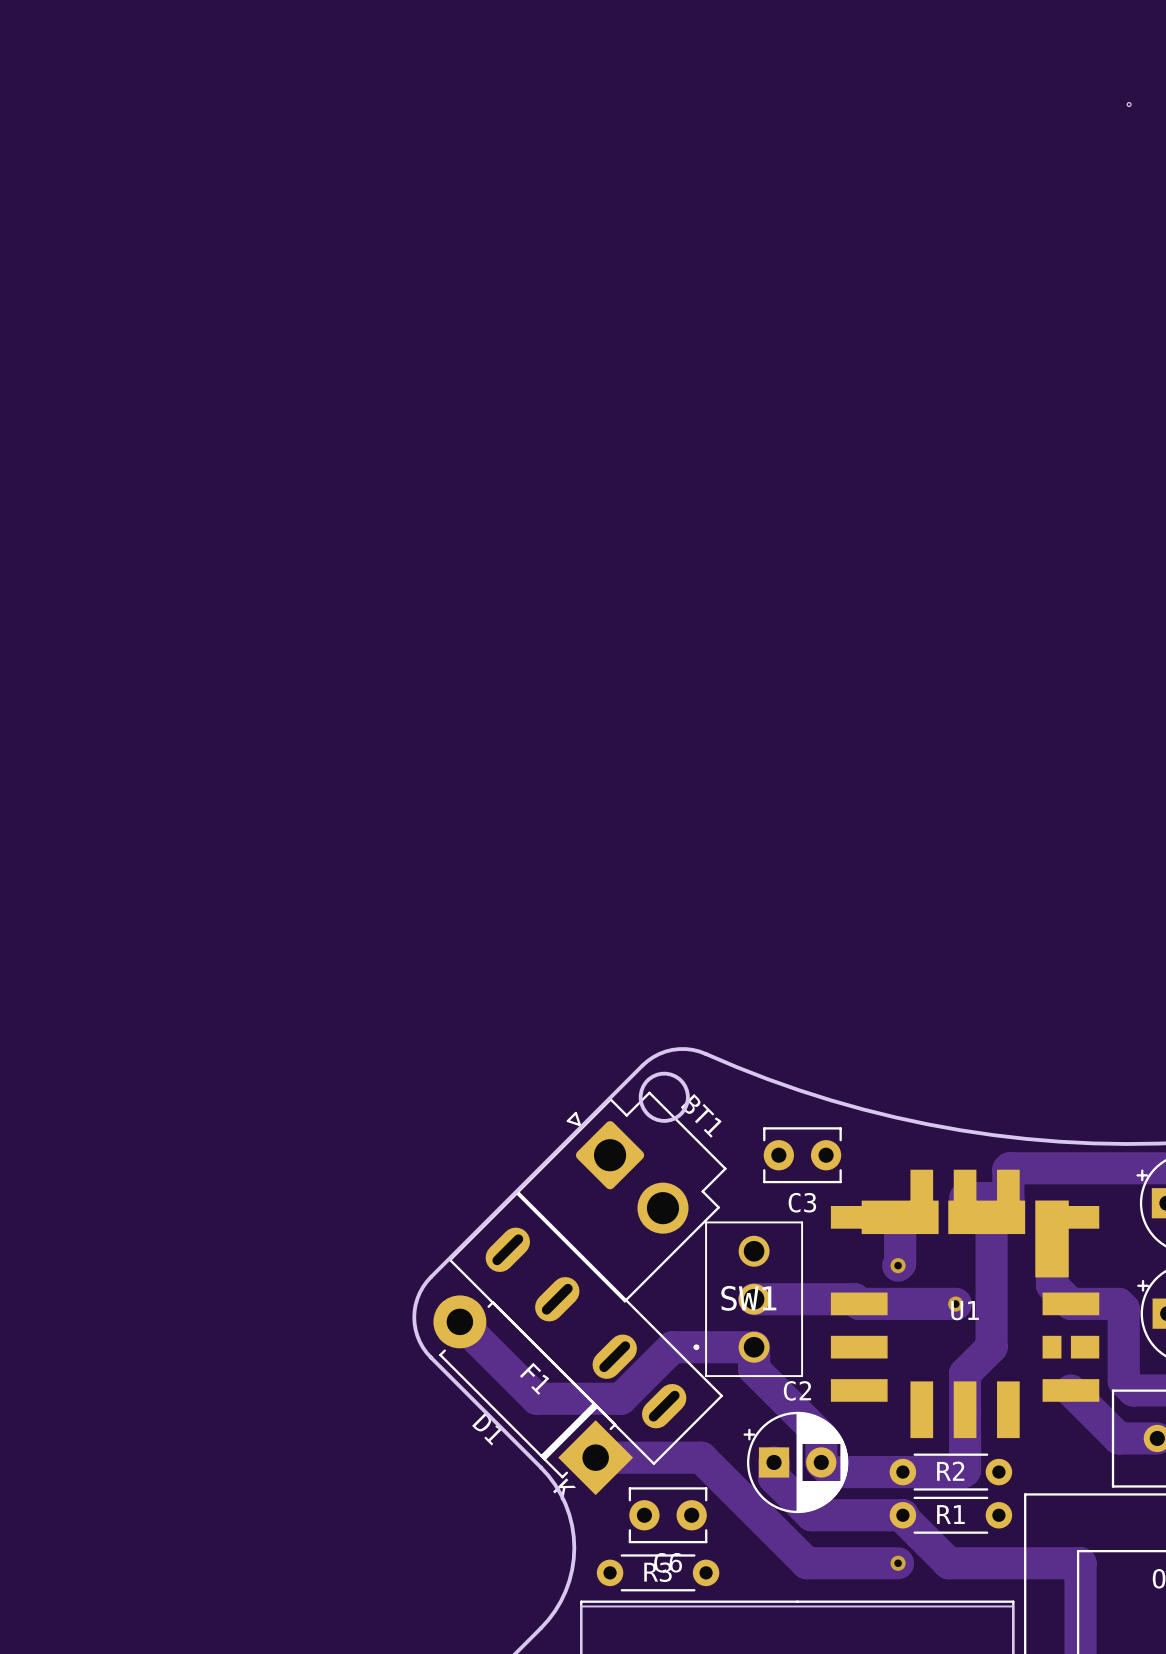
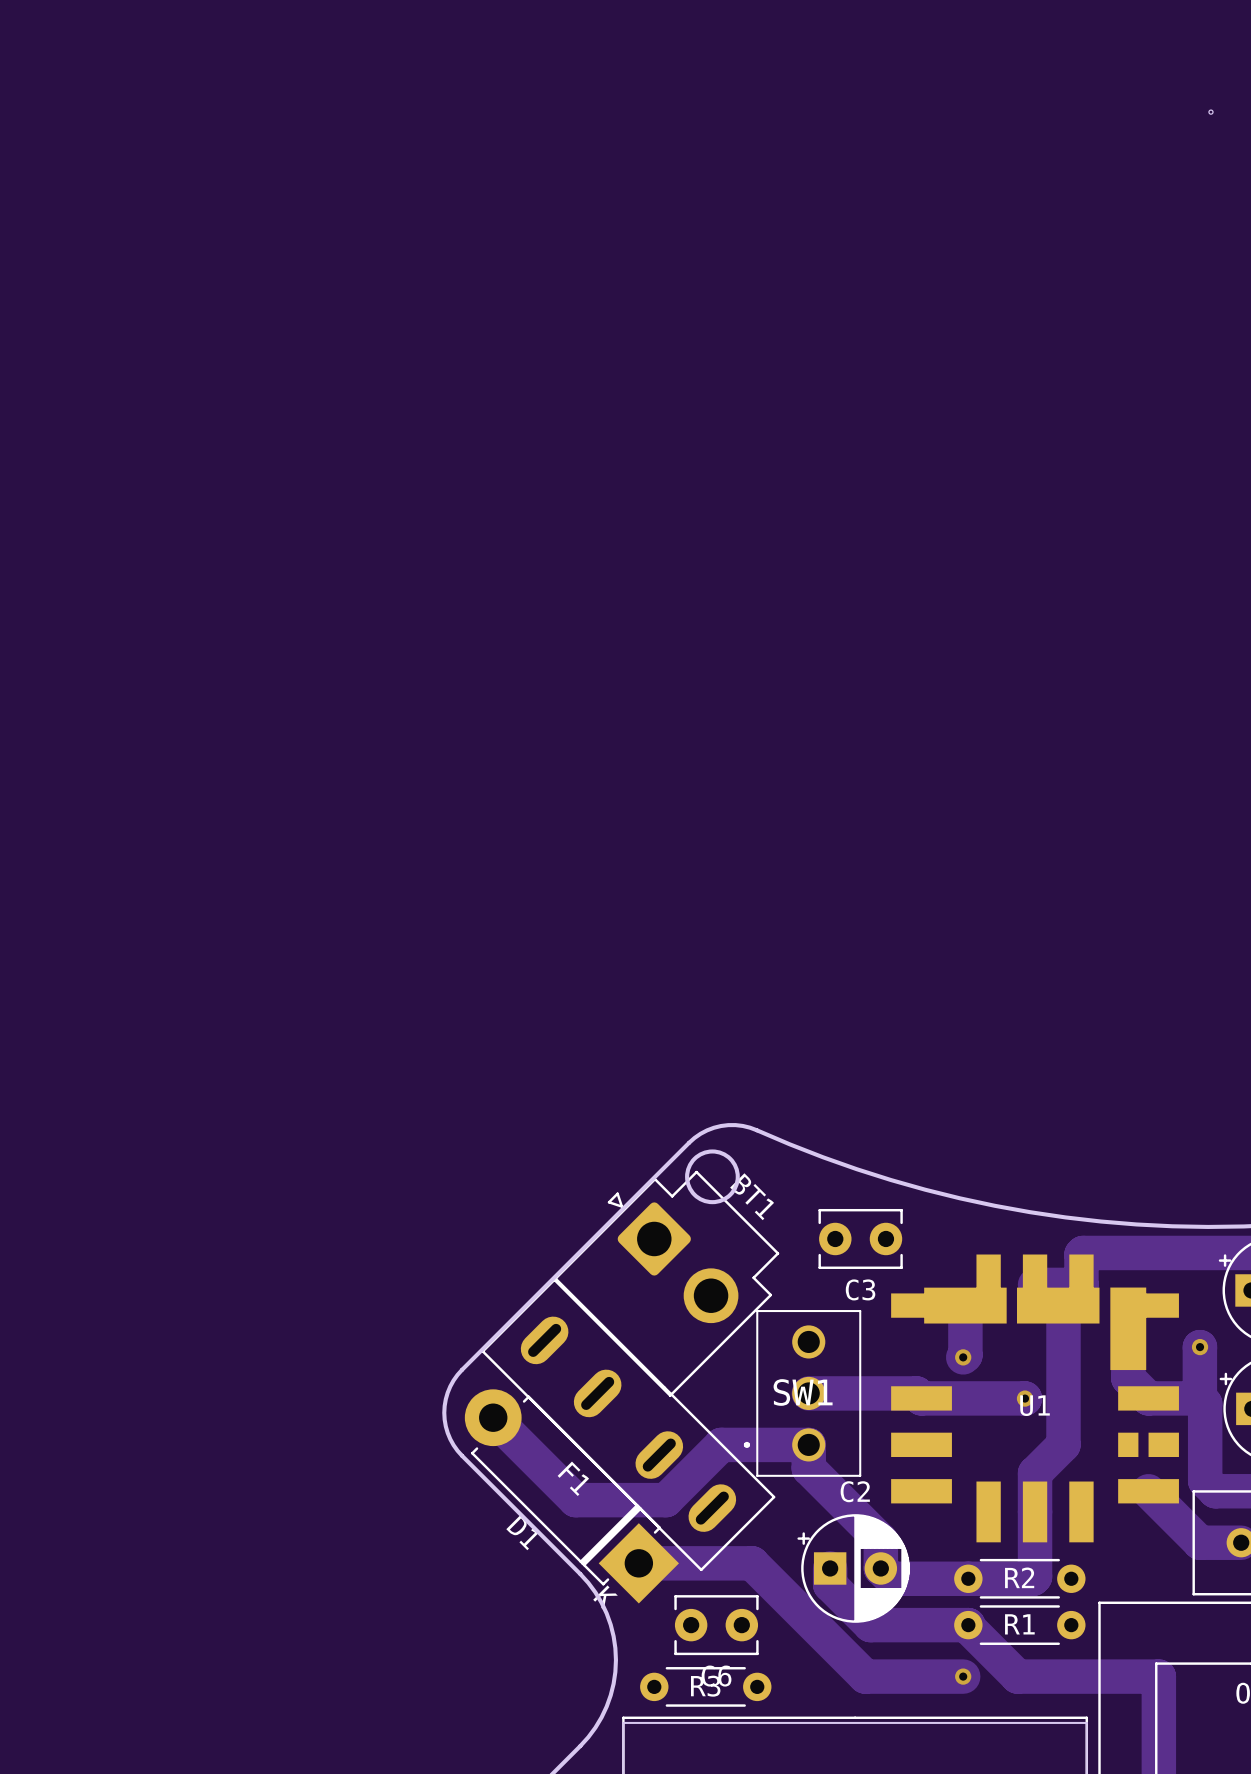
track: none -> (1199, 1347) (1199, 1398)
via: none -> (1200, 1347)

